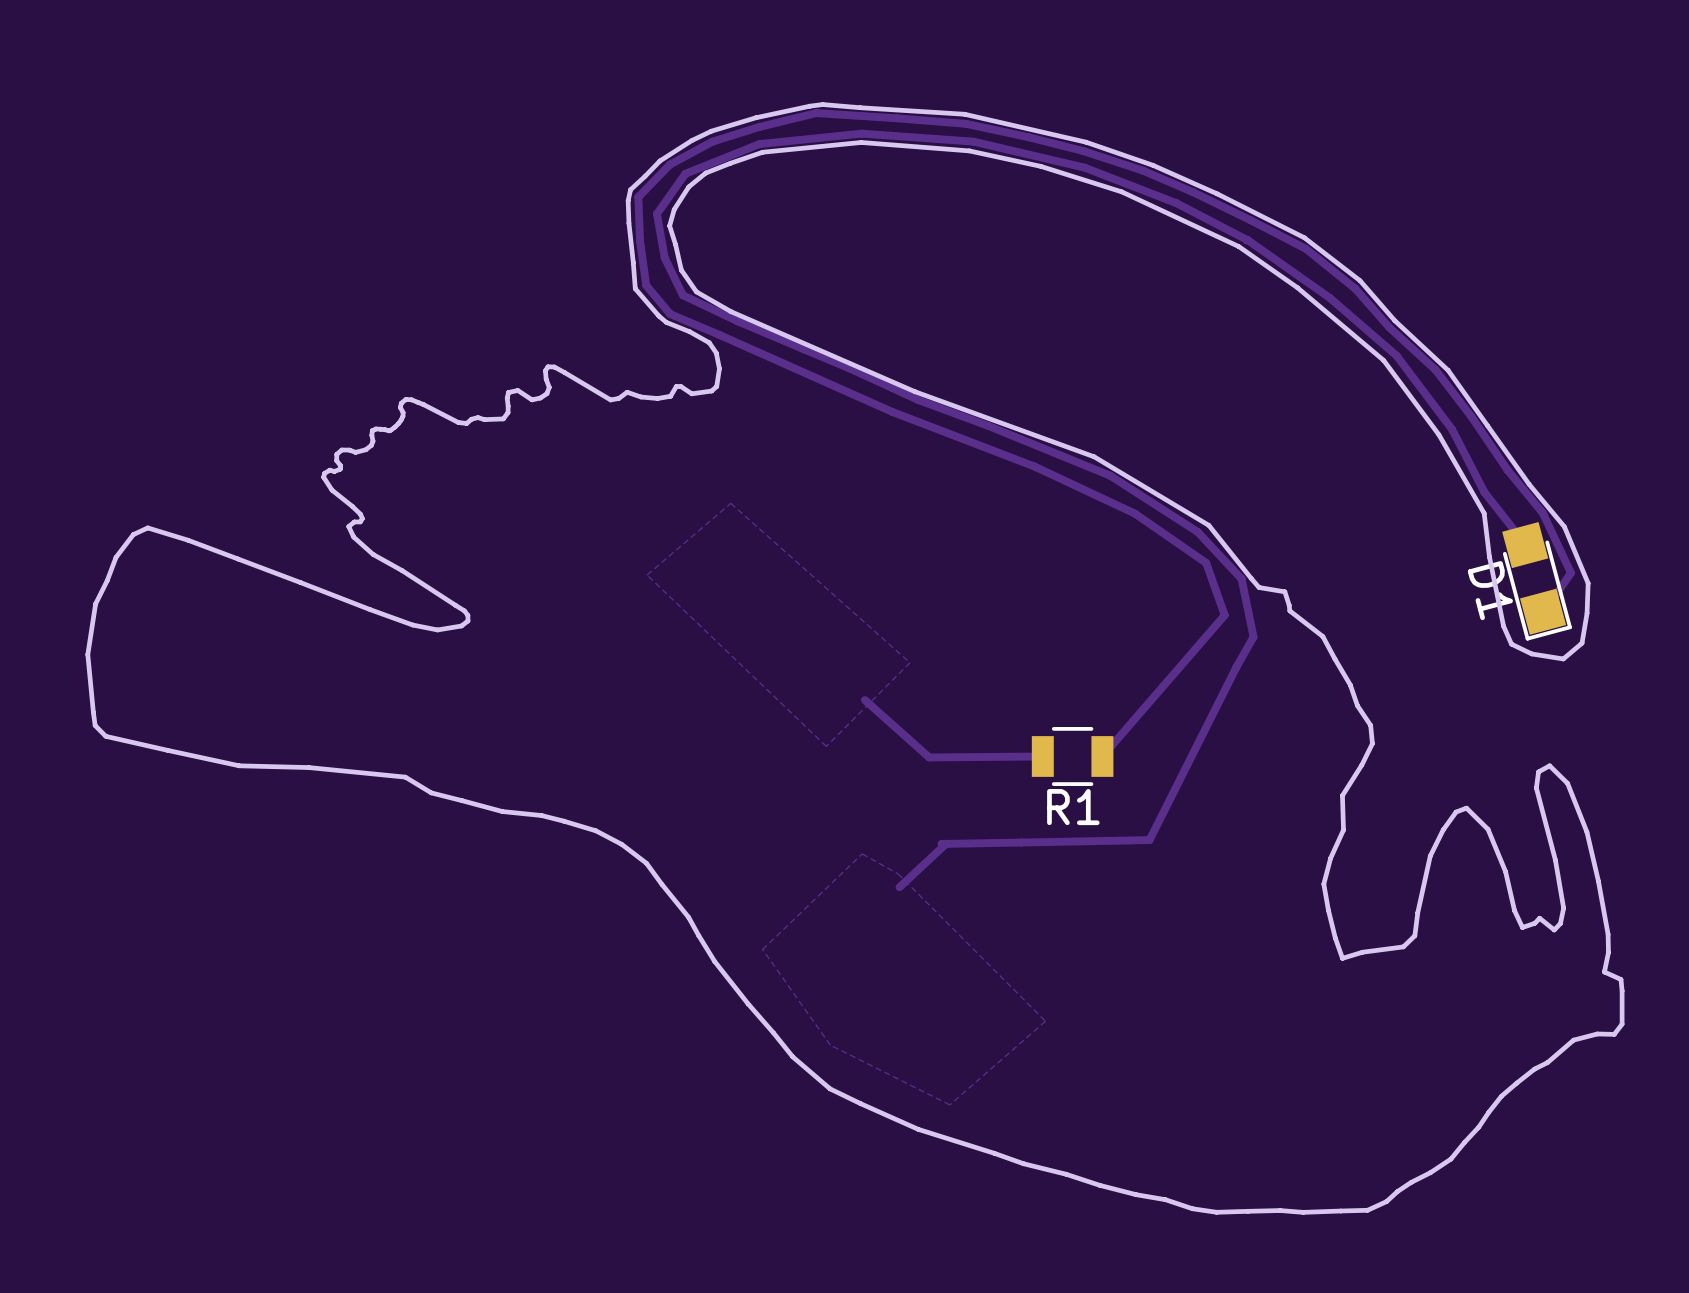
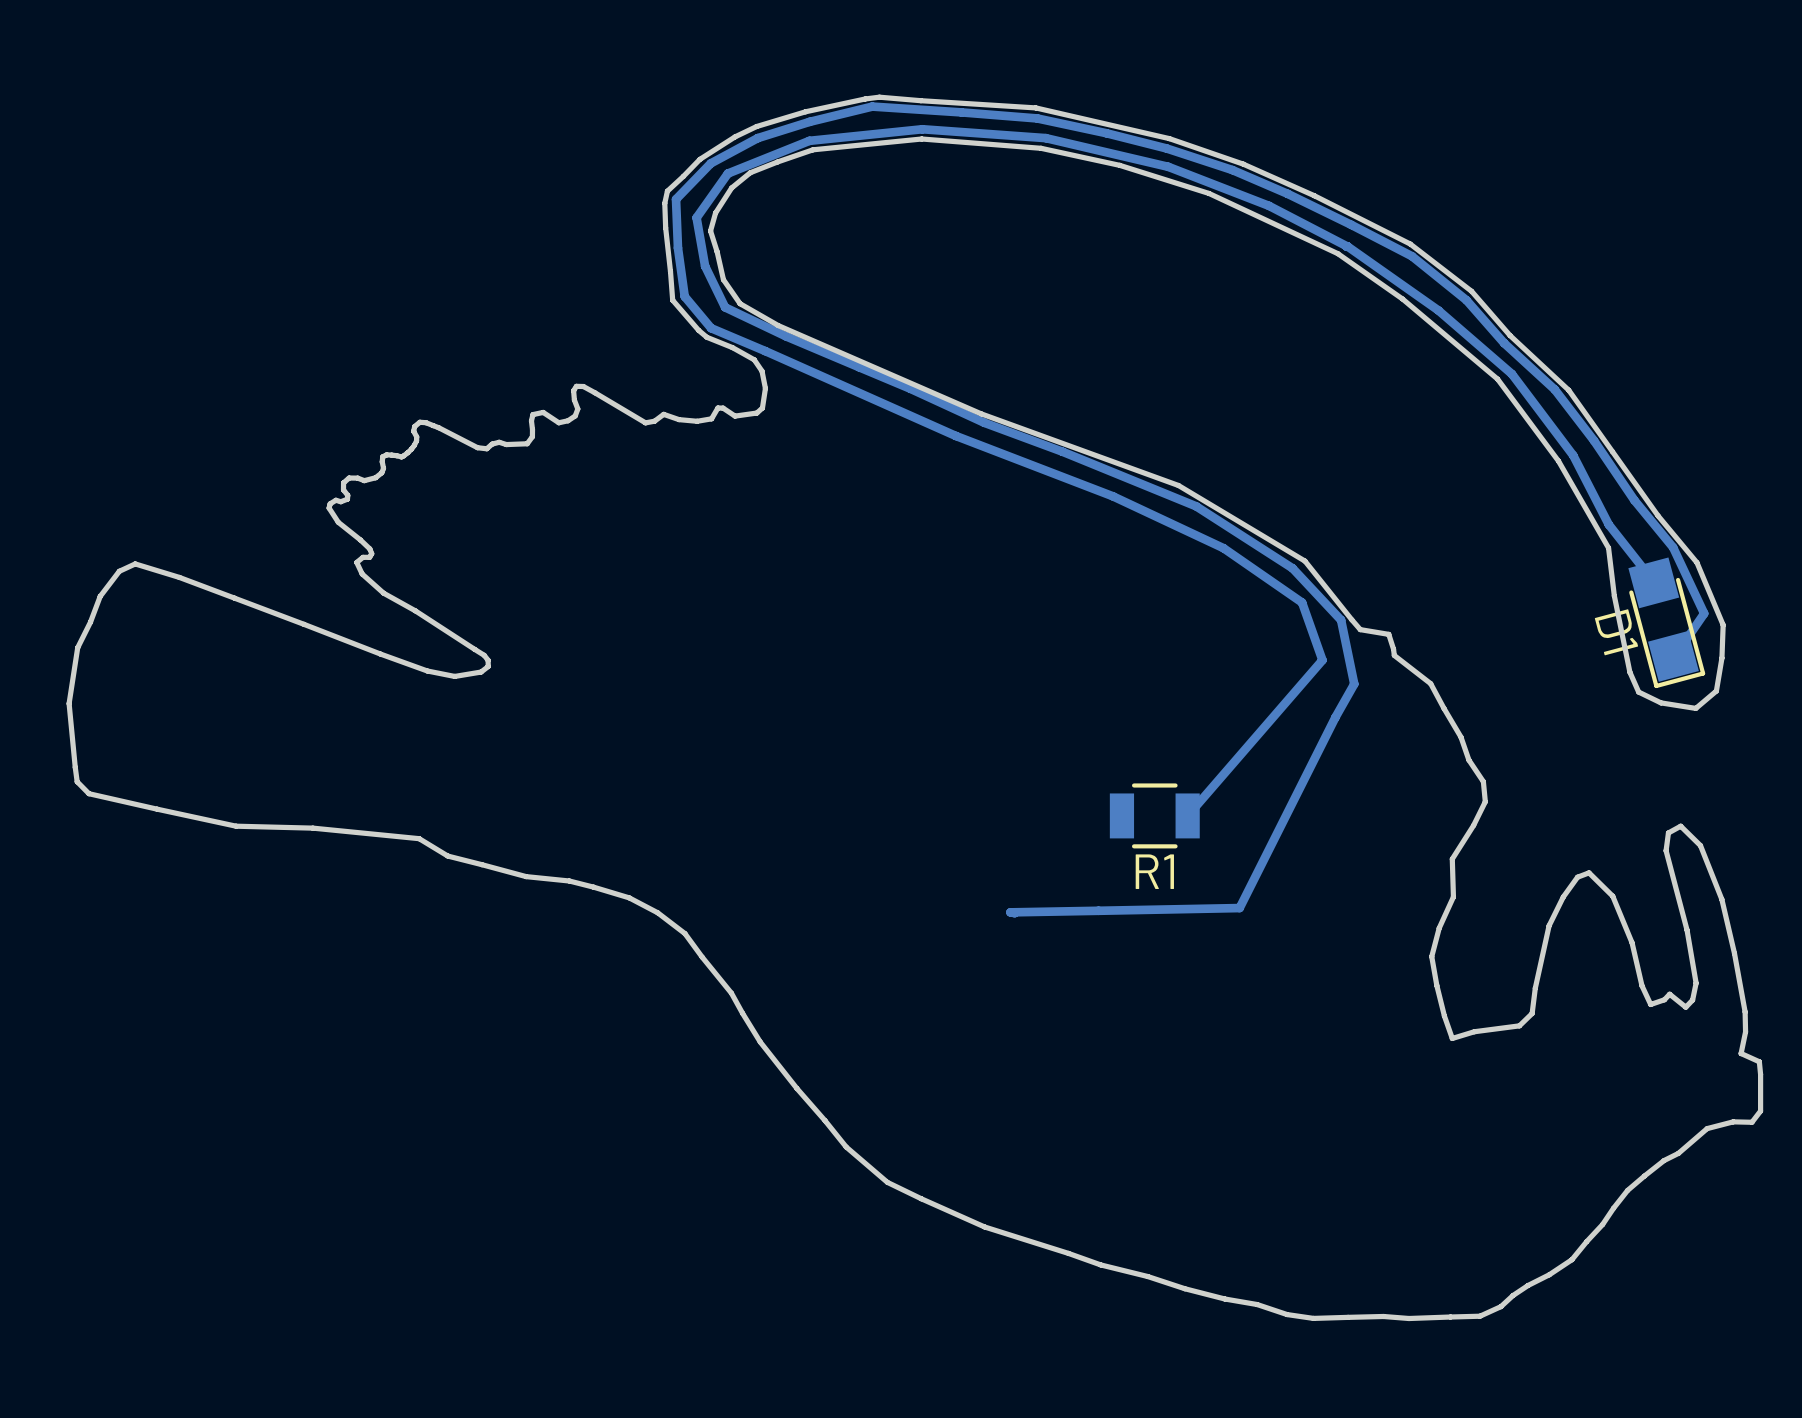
zone outline: (730, 503) (647, 575) (826, 746) (910, 662) (730, 503) -> none
track: (864, 700) (929, 757) (1042, 756) -> none
track: (945, 844) (899, 887) -> none
zone outline: (862, 853) (762, 949) (830, 1045) (949, 1104) (1045, 1021) (898, 873) (862, 853) -> none

